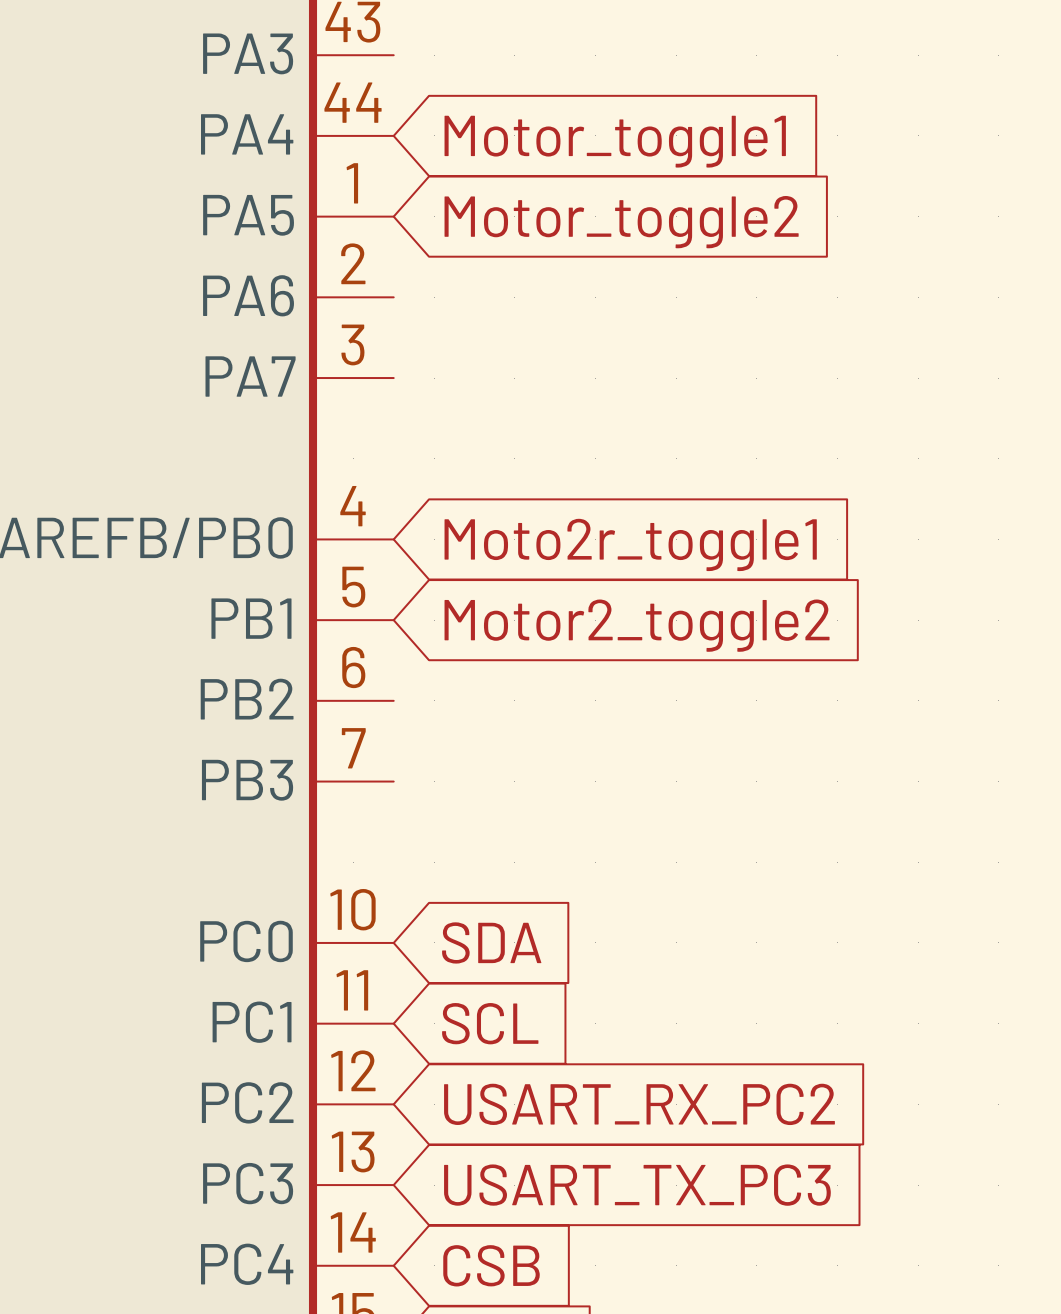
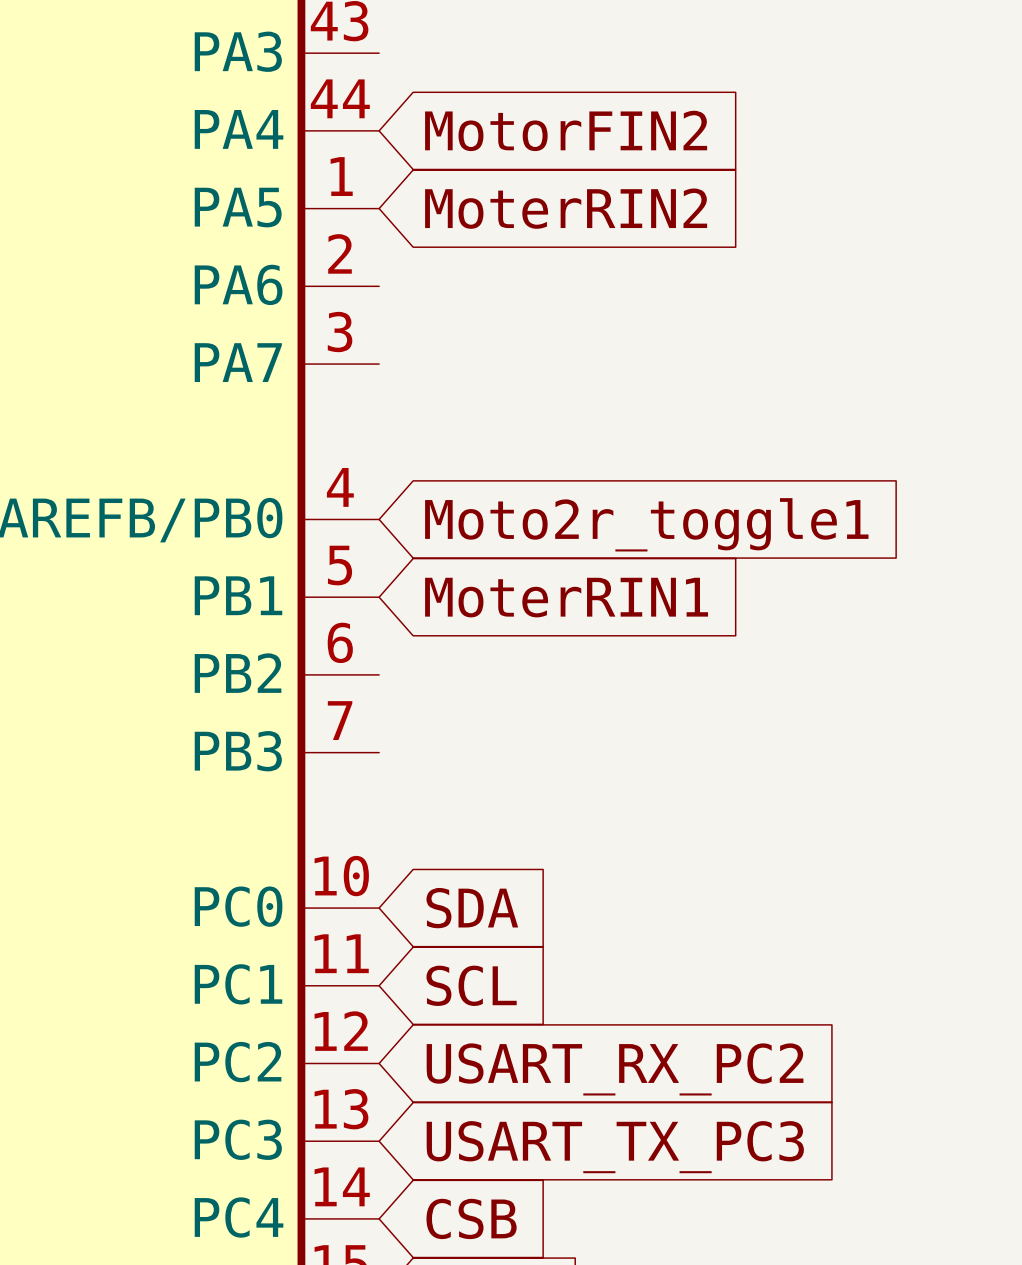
global label: Motor_toggle1 (615, 141) -> MotorFIN2 (566, 130)
global label: Motor_toggle2 (621, 222) -> MoterRIN2 (566, 208)
global label: Motor2_toggle2 (637, 625) -> MoterRIN1 (566, 597)

